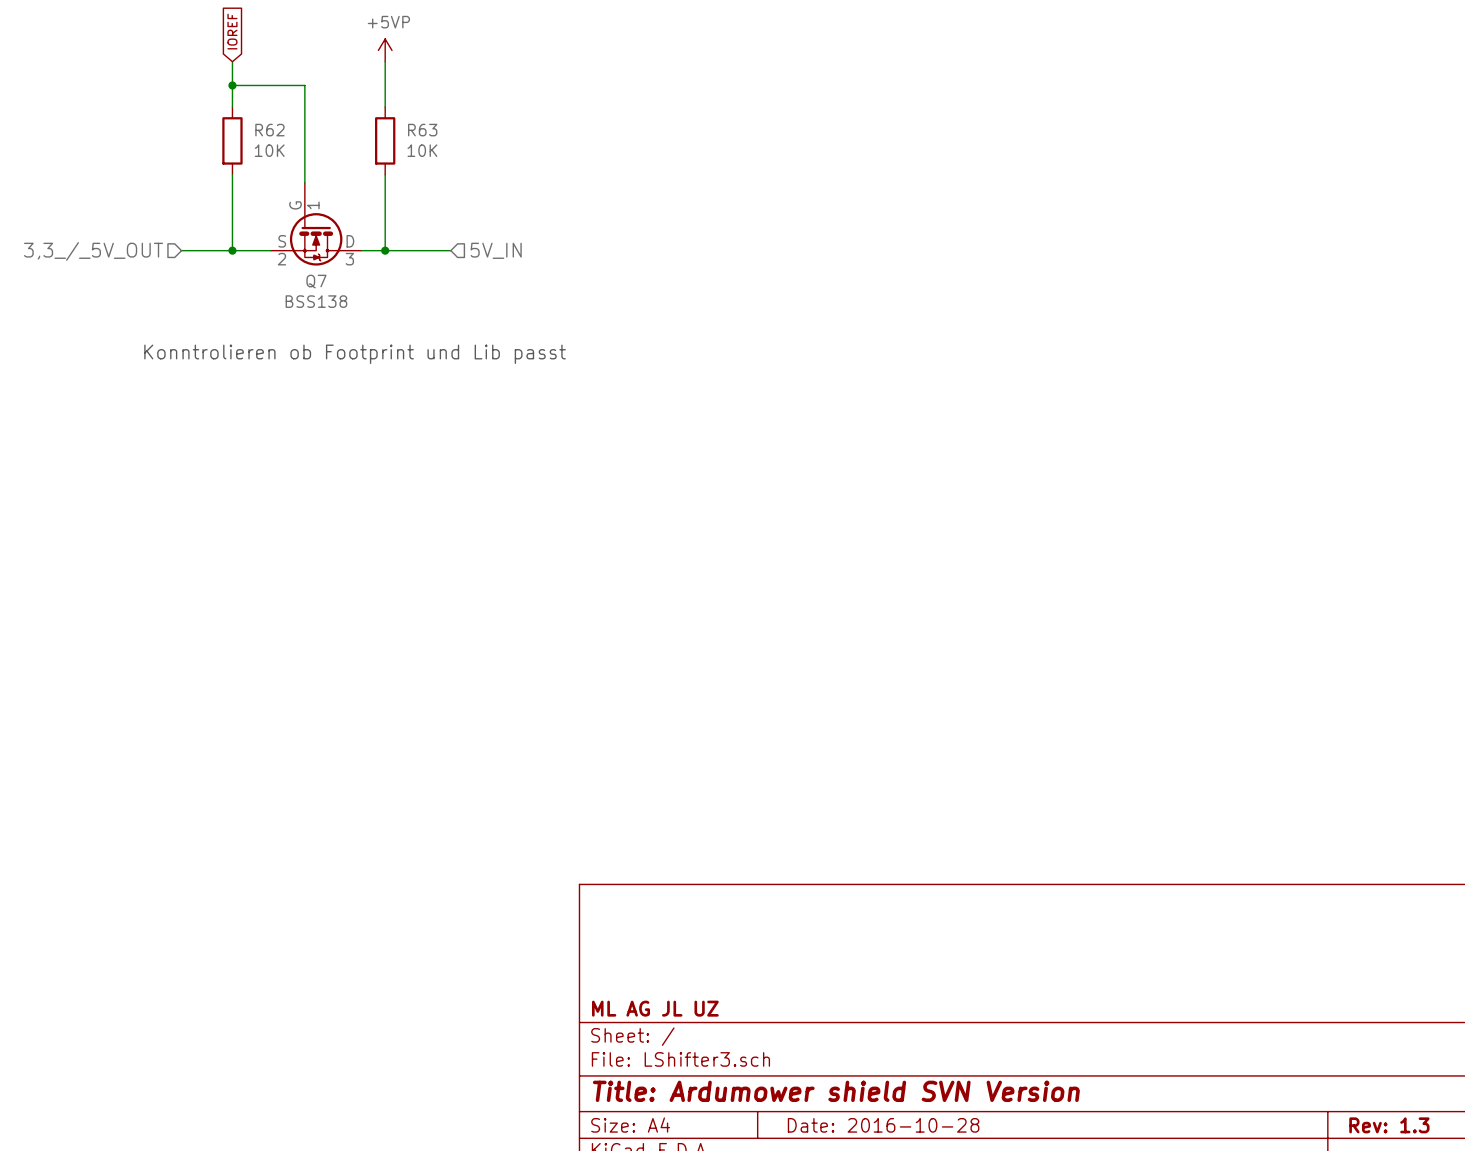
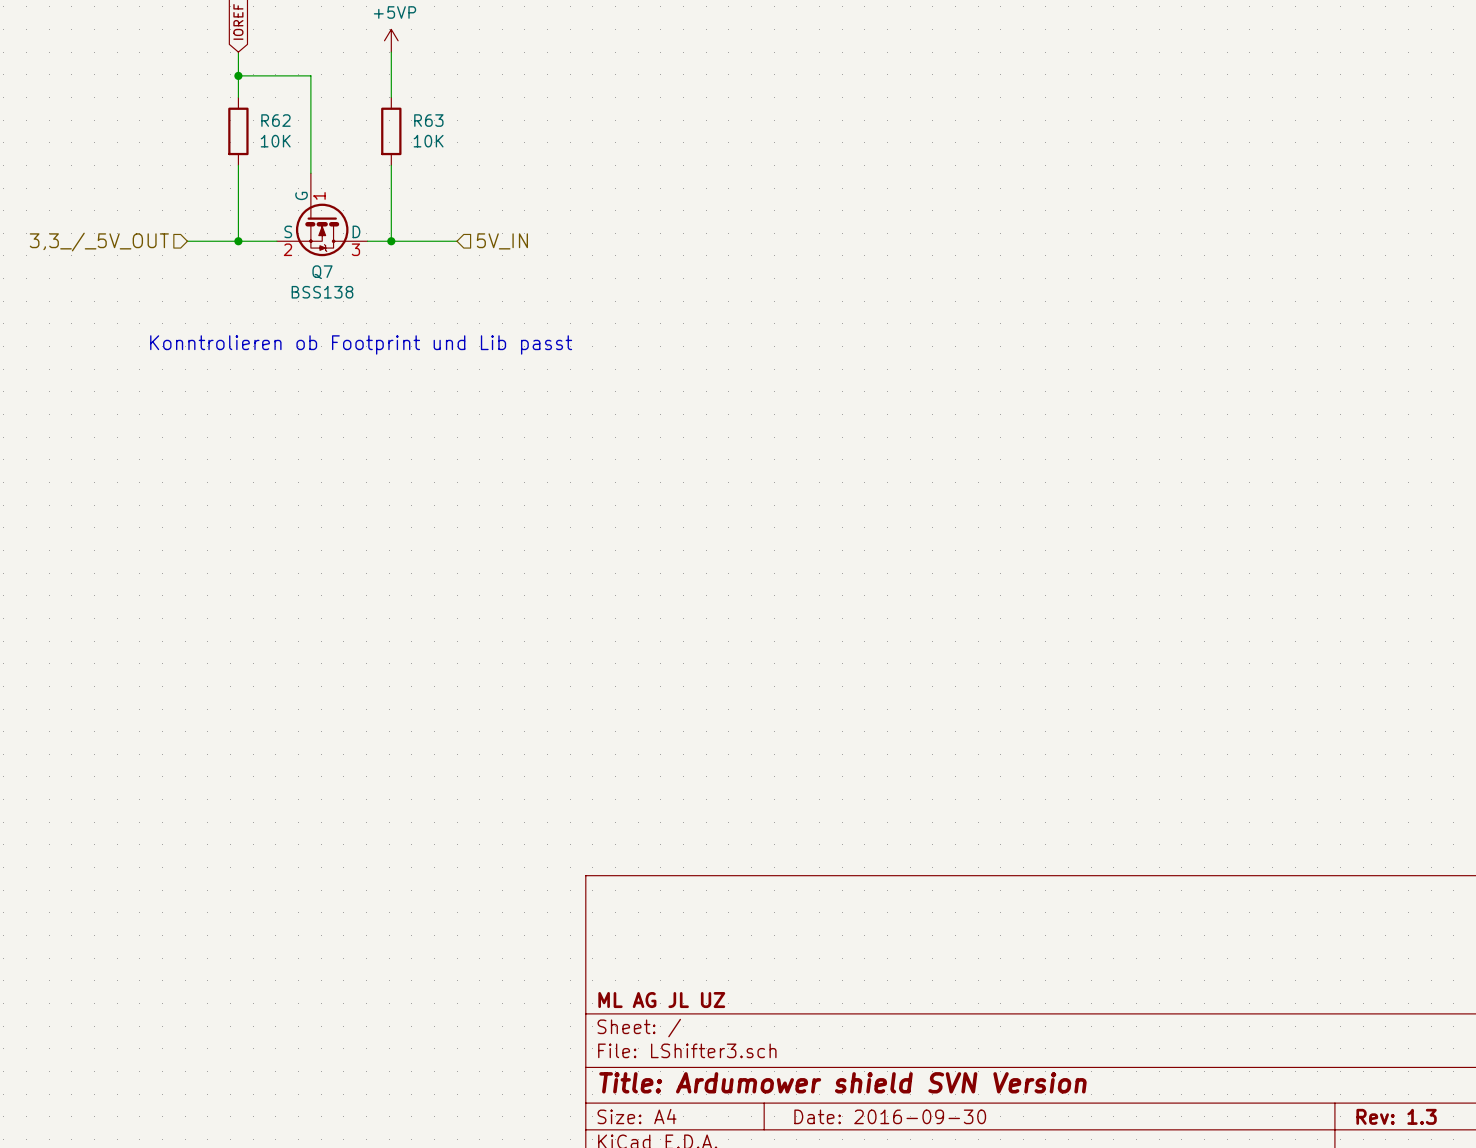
title block: Date: 2016-10-28 (883, 1125) -> Date: 2016-09-30 (890, 1116)

